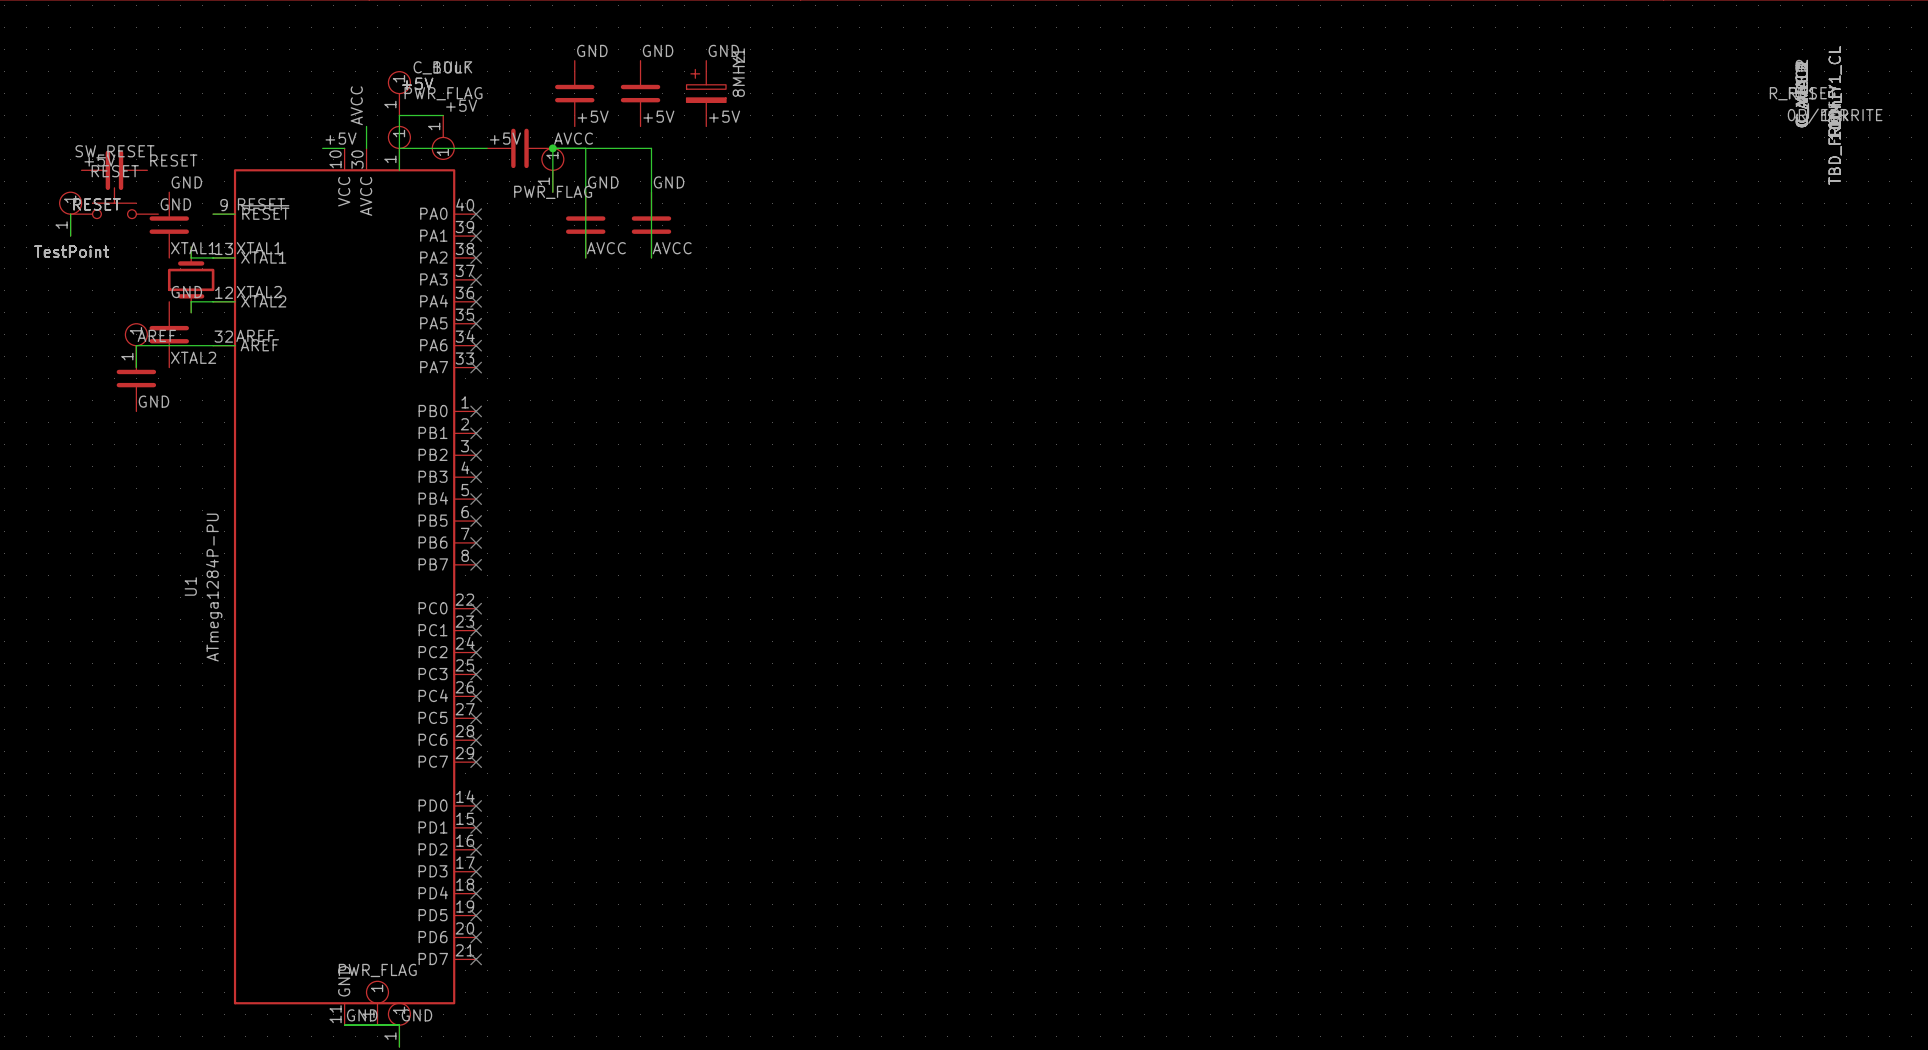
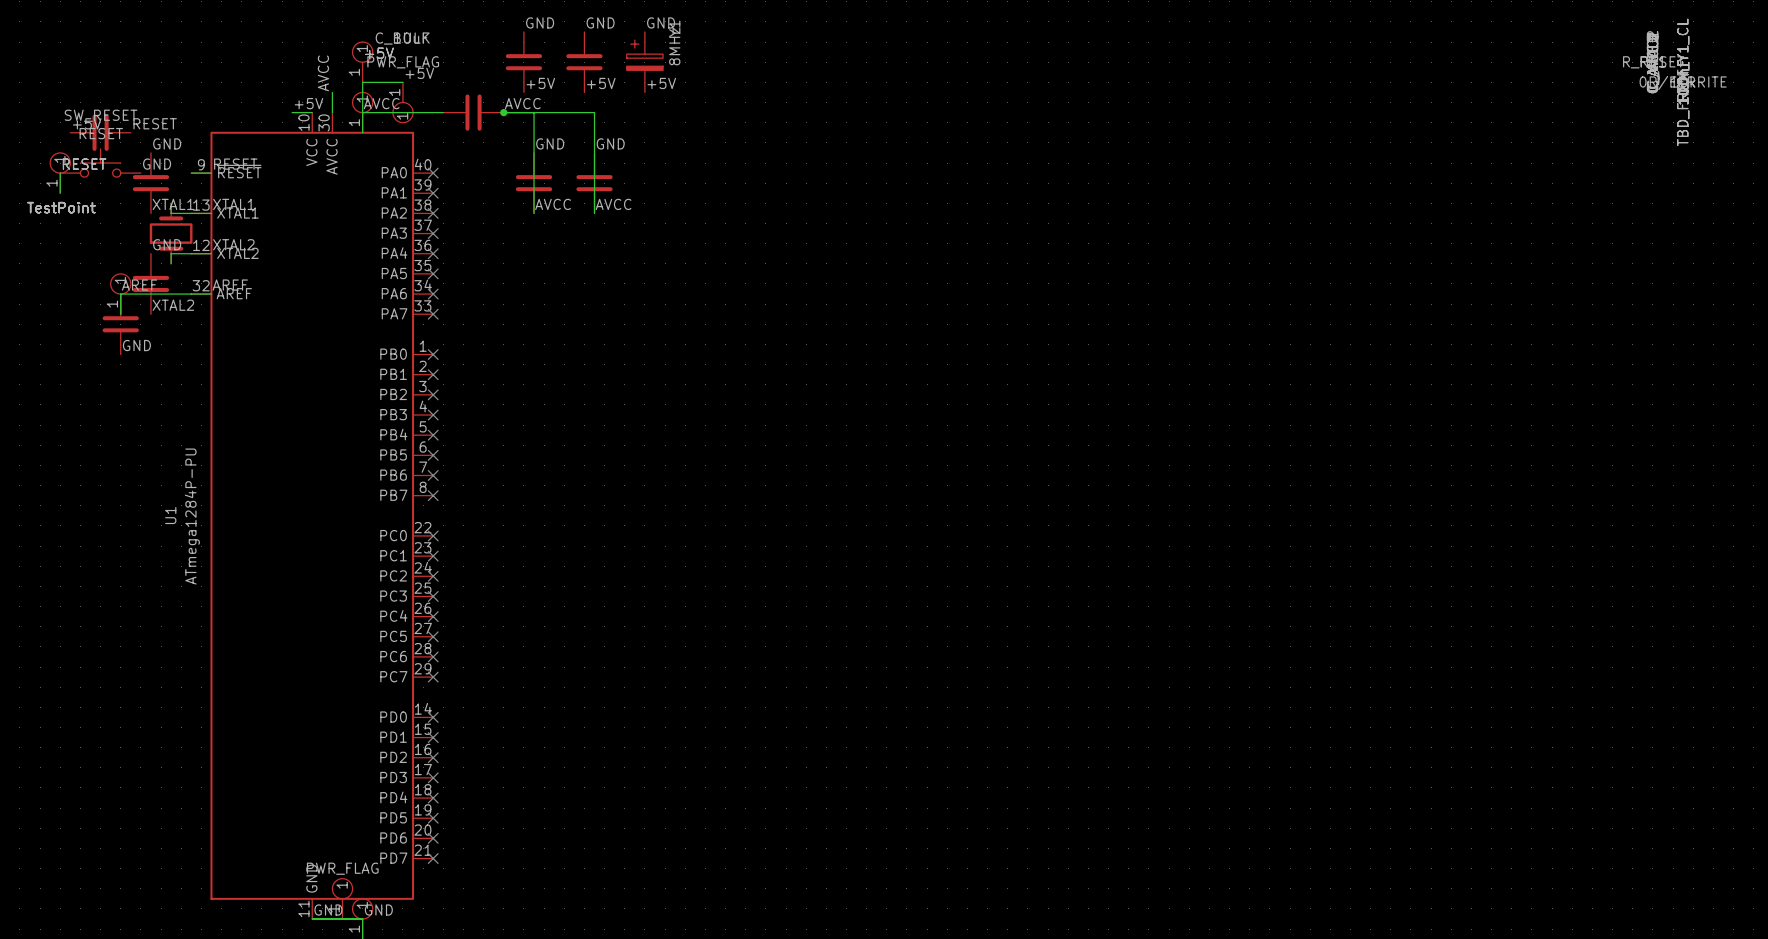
label: none -> AVCC (381, 103)
label: +5V (505, 138) -> none
wire: (552, 148) (552, 192) -> none
power symbol: PWR_FLAG (552, 170) -> none

